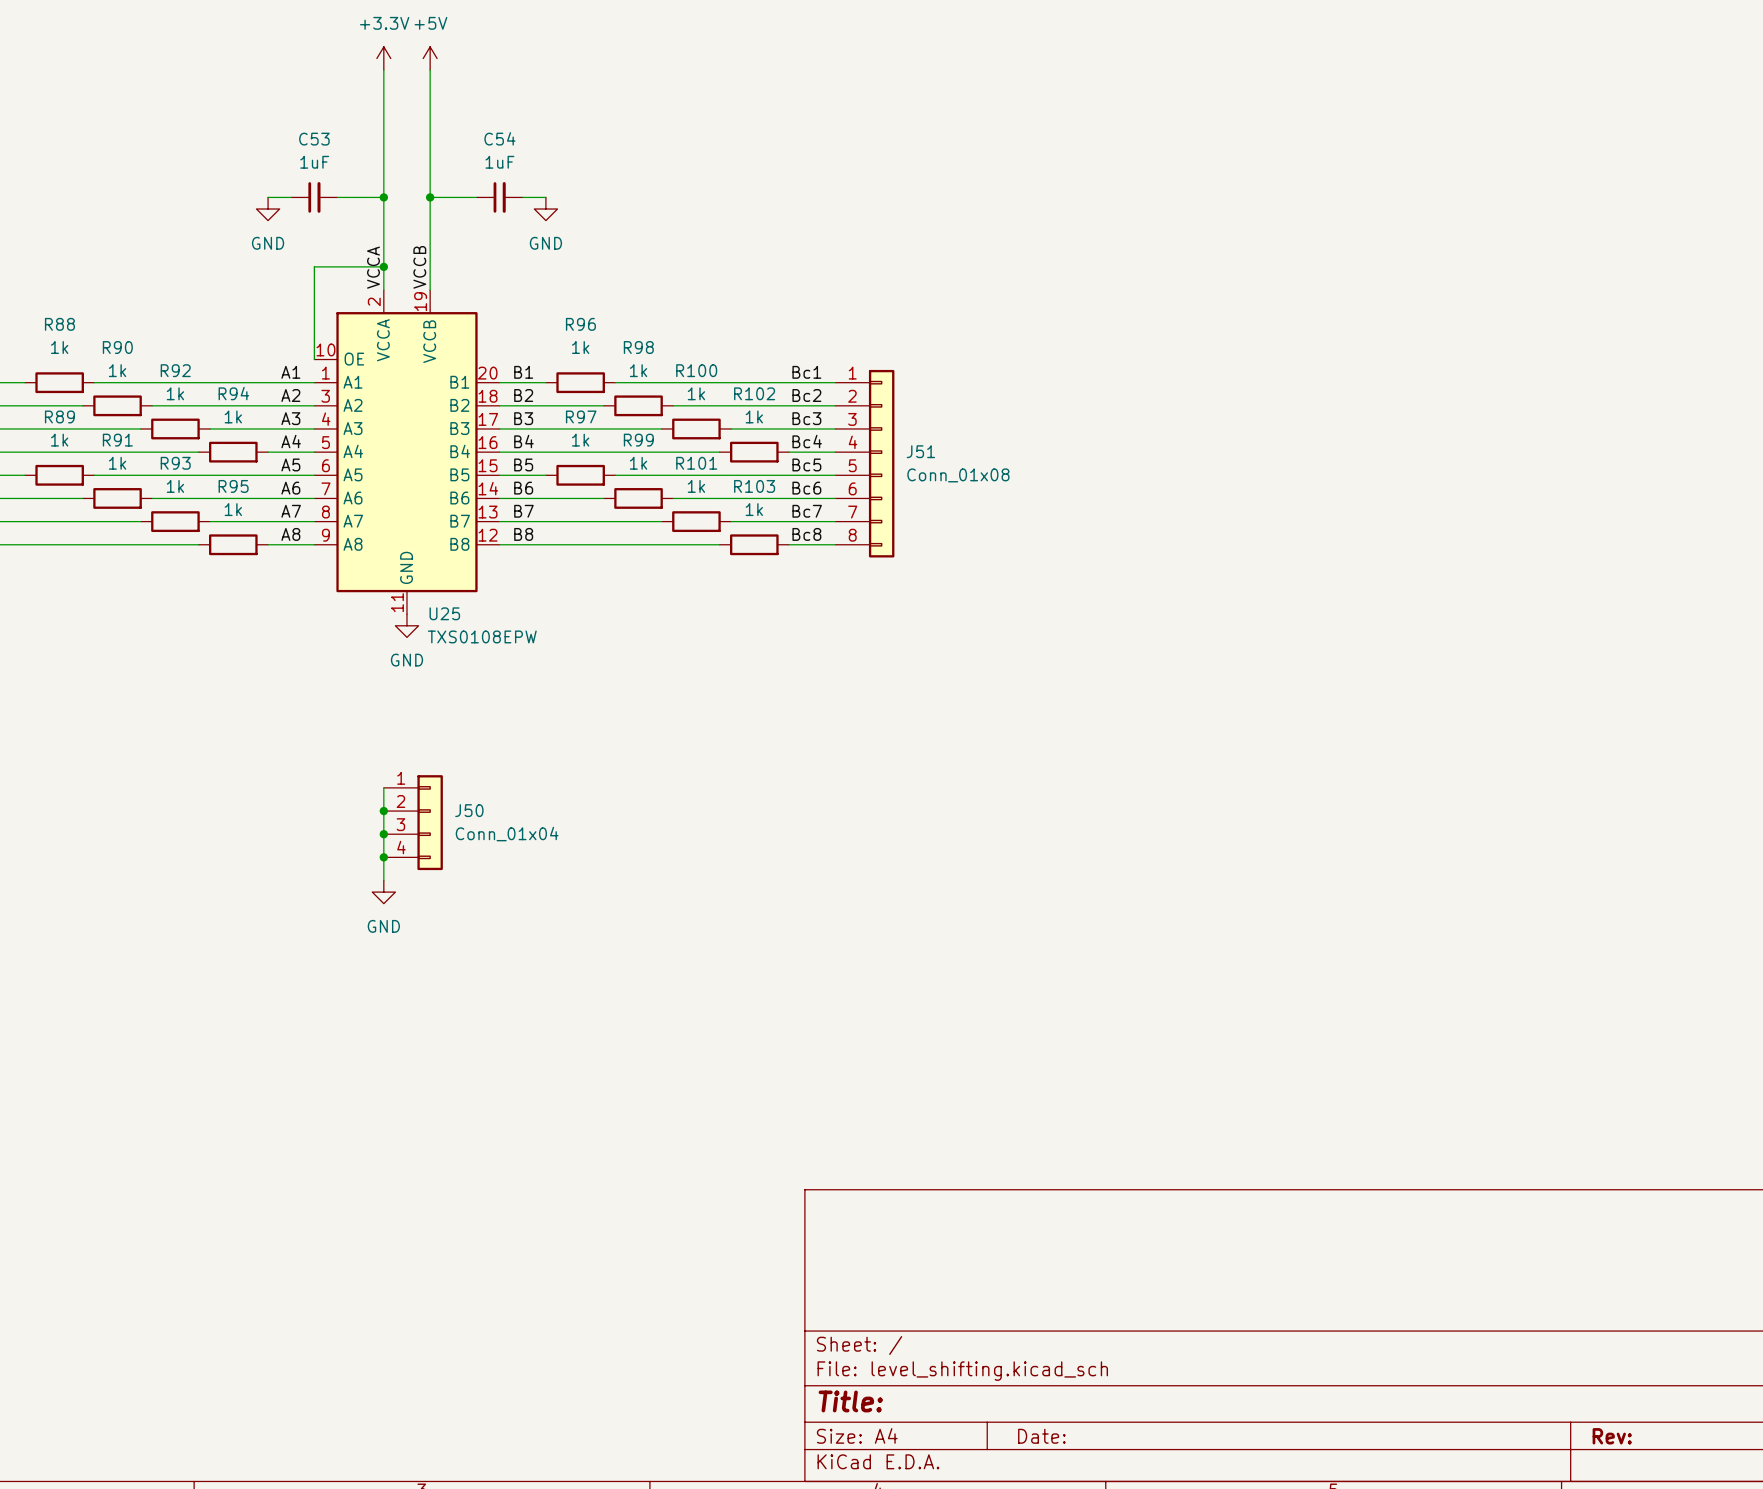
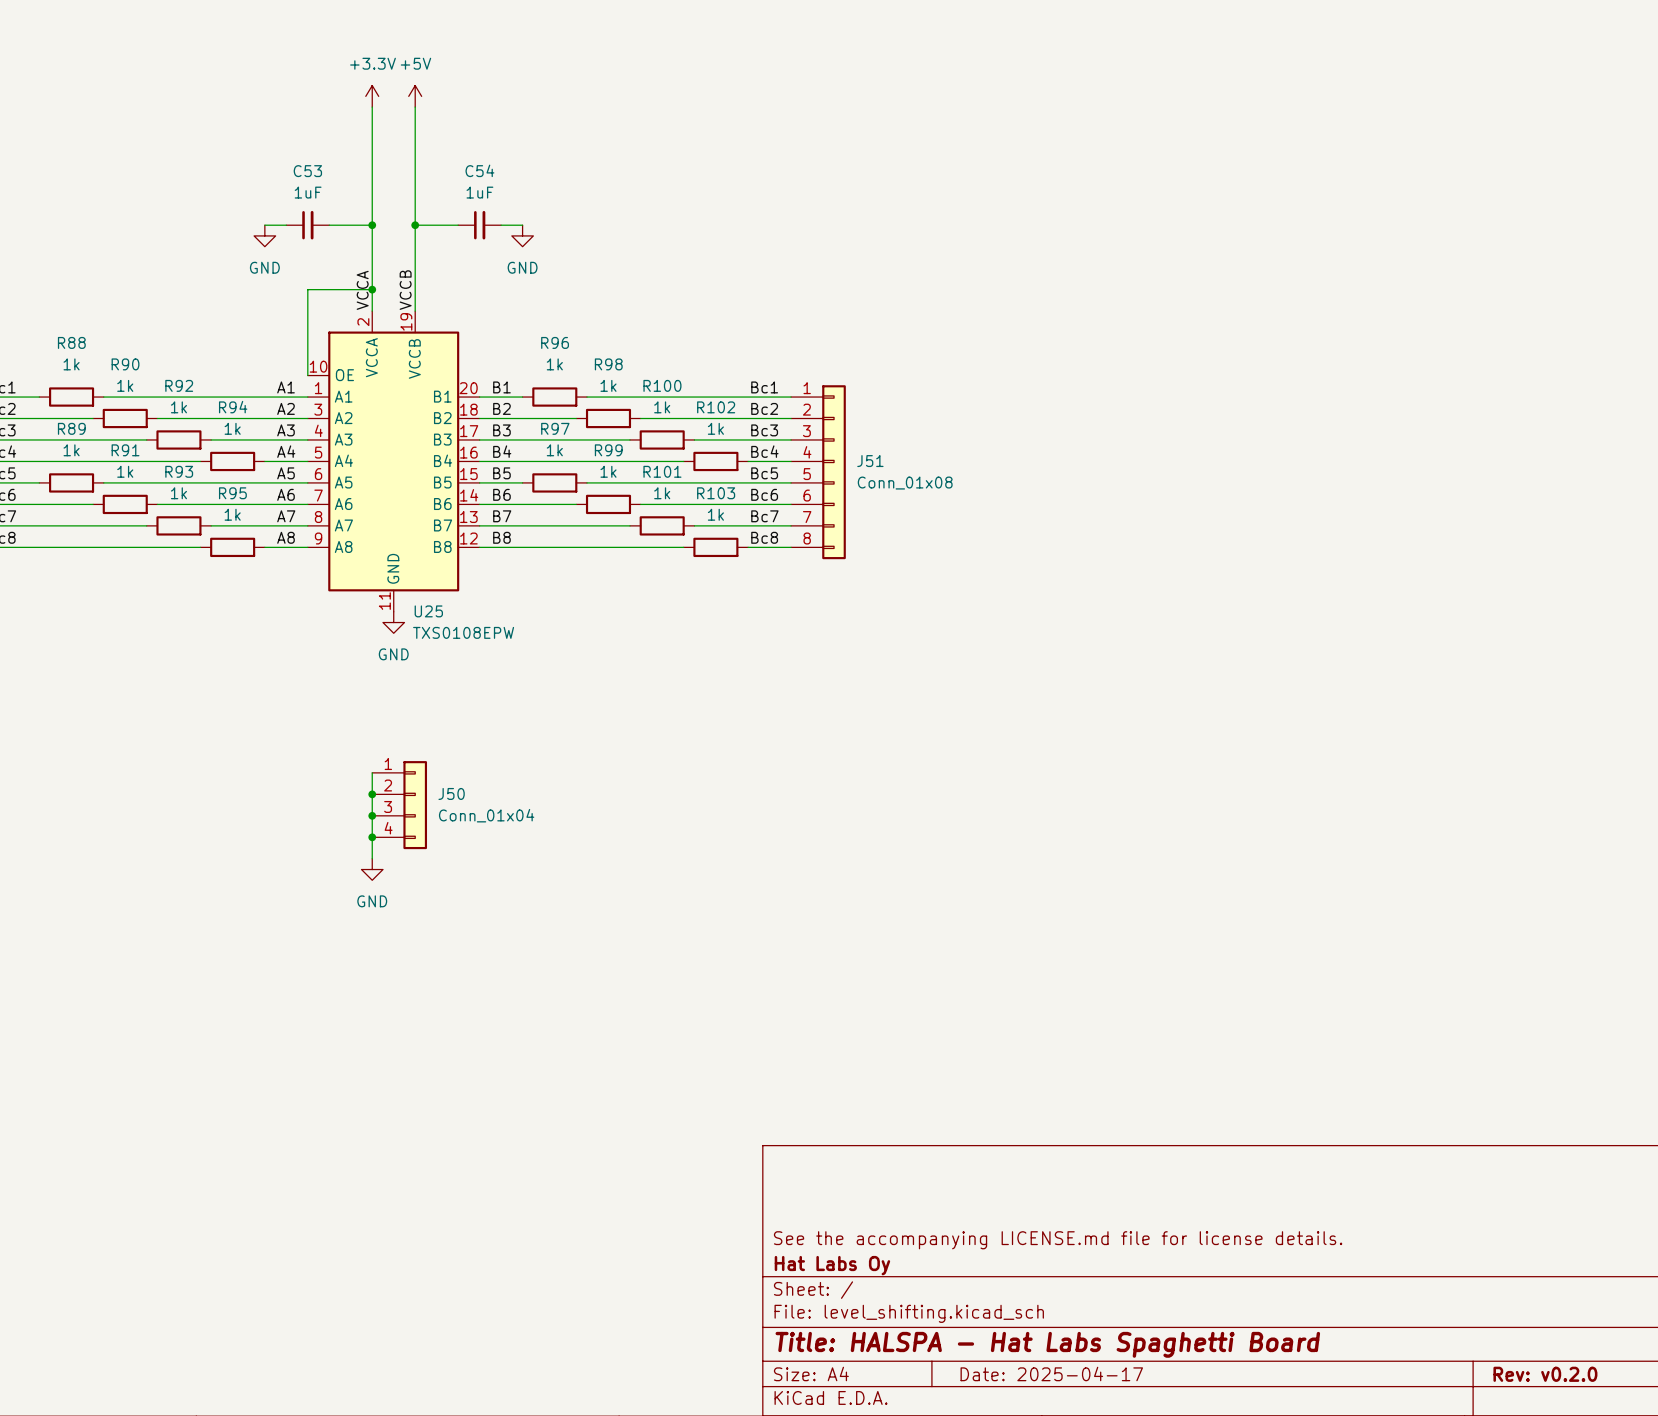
title block: none -> See the accompanying LICENSE.md file for license details. (1058, 1240)
title block: none -> Hat Labs Oy (832, 1265)
title block: Title: (850, 1401) -> Title: HALSPA - Hat Labs Spaghetti Board (1047, 1344)
title block: Date: (1041, 1436) -> Date: 2025-04-17 (1051, 1373)
title block: Rev: (1612, 1436) -> Rev: v0.2.0 (1545, 1374)

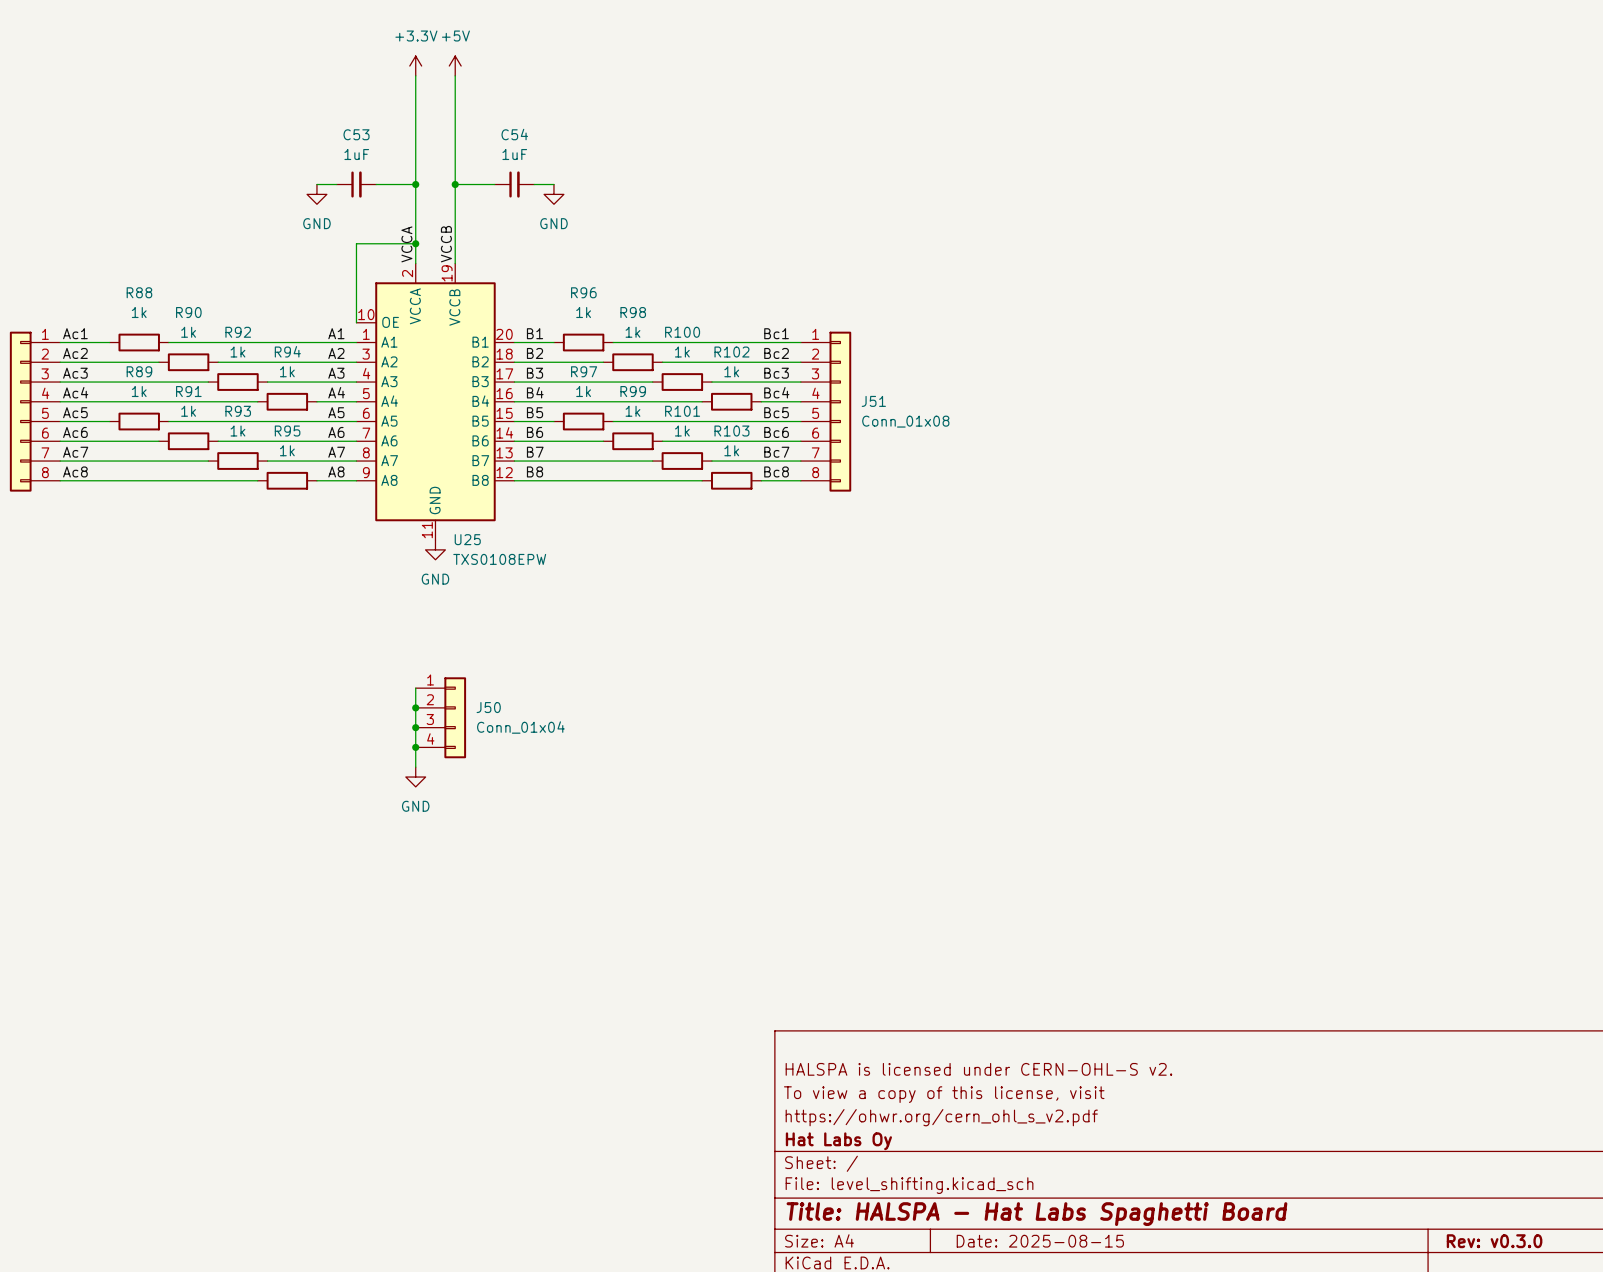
title block: none -> HALSPA is licensed under CERN-OHL-S v2. (978, 1069)
title block: none -> To view a copy of this license, visit (944, 1094)
title block: See the accompanying LICENSE.md file for license details. (1058, 1240) -> https://ohwr.org/cern_ohl_s_v2.pdf (941, 1117)
title block: Date: 2025-04-17 (1051, 1373) -> Date: 2025-08-15 (1040, 1241)
title block: Rev: v0.2.0 (1545, 1374) -> Rev: v0.3.0 (1494, 1241)

